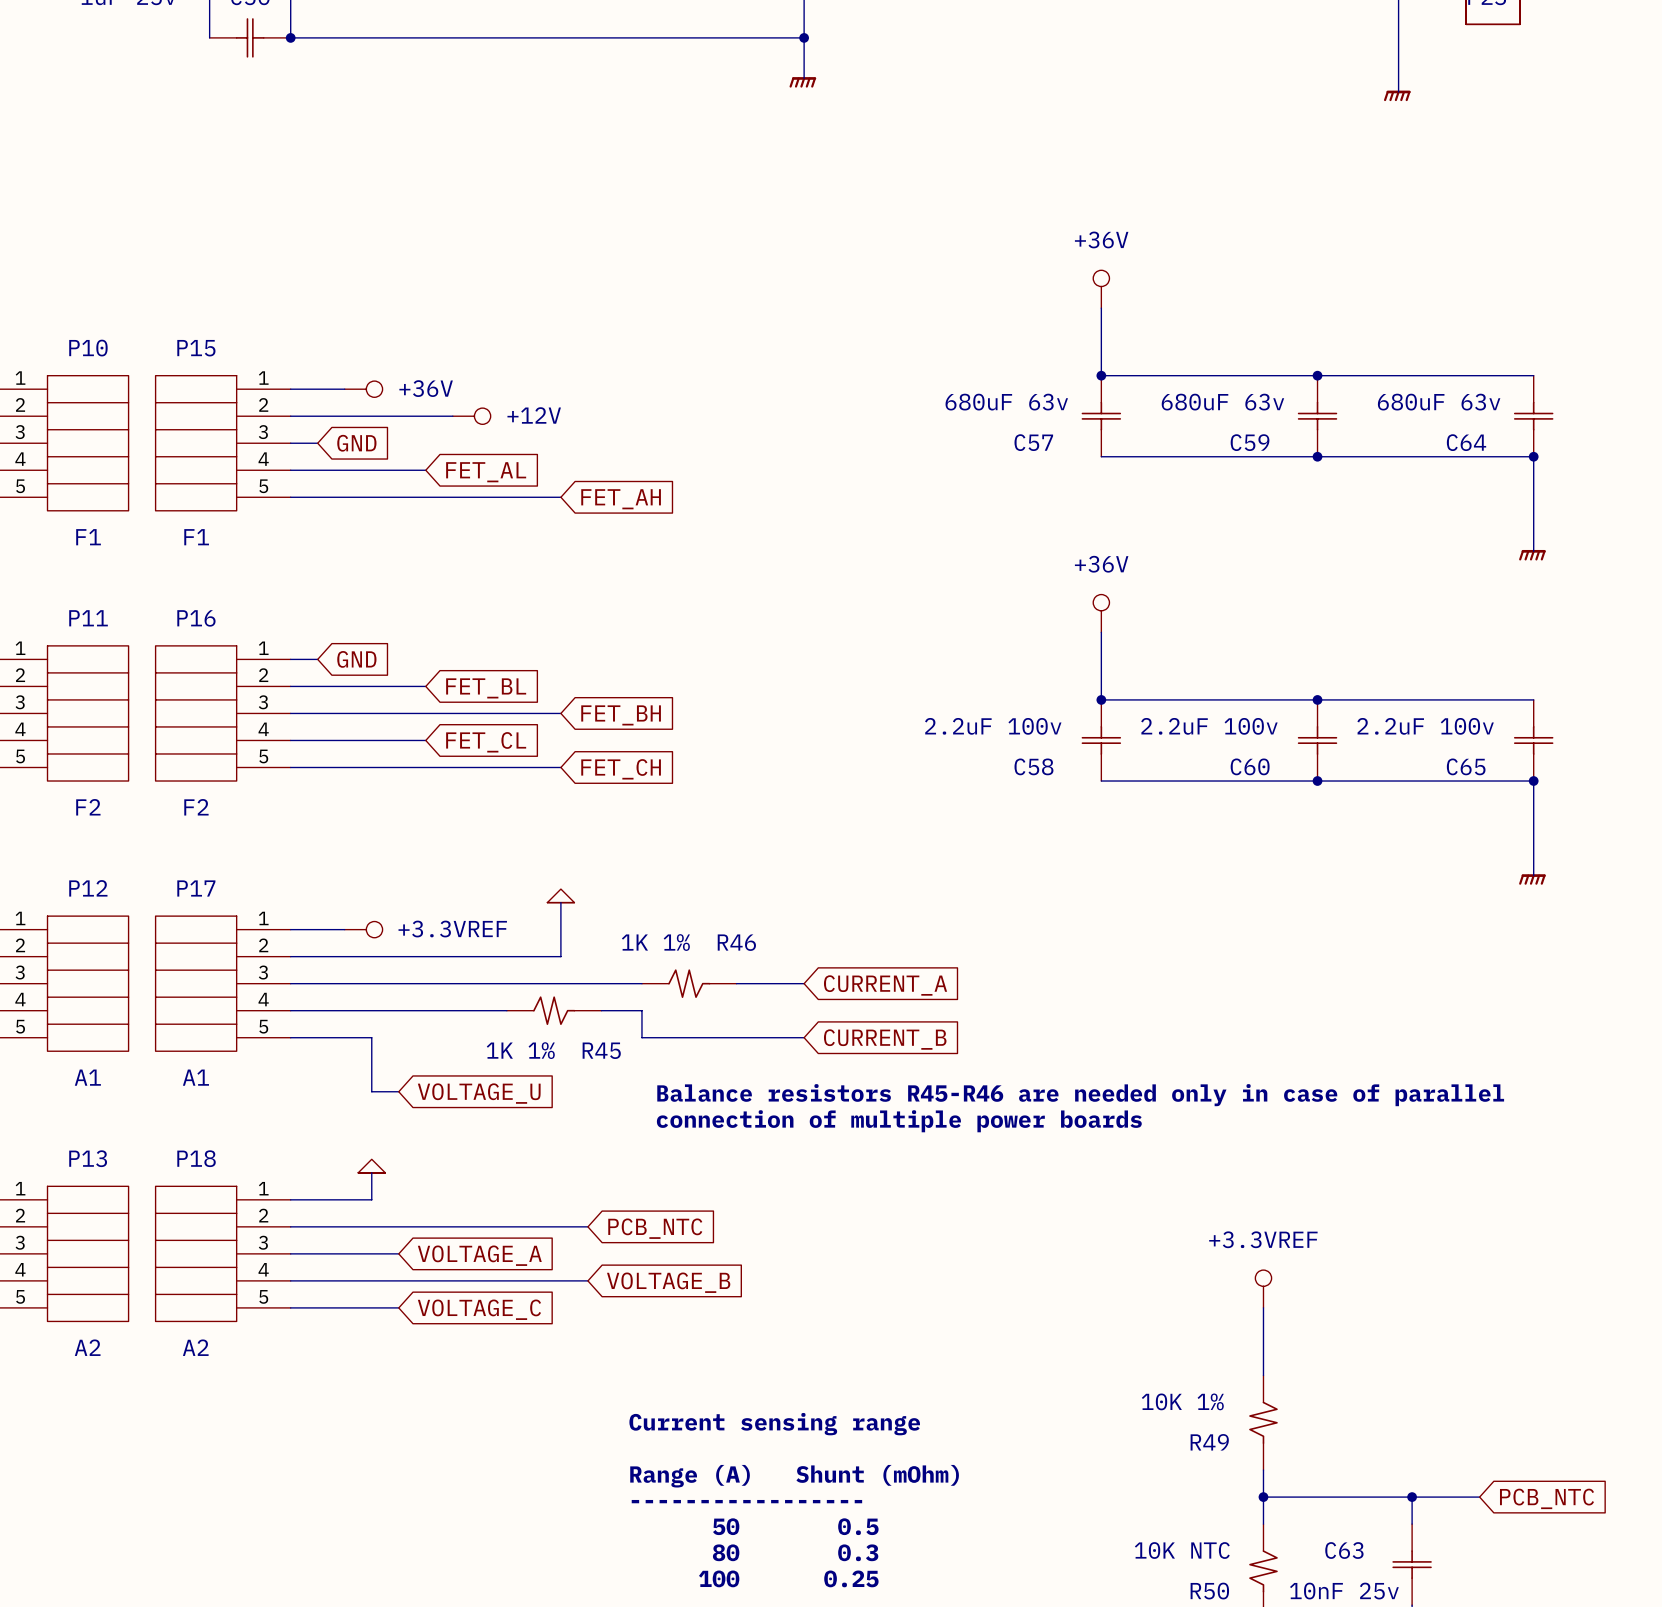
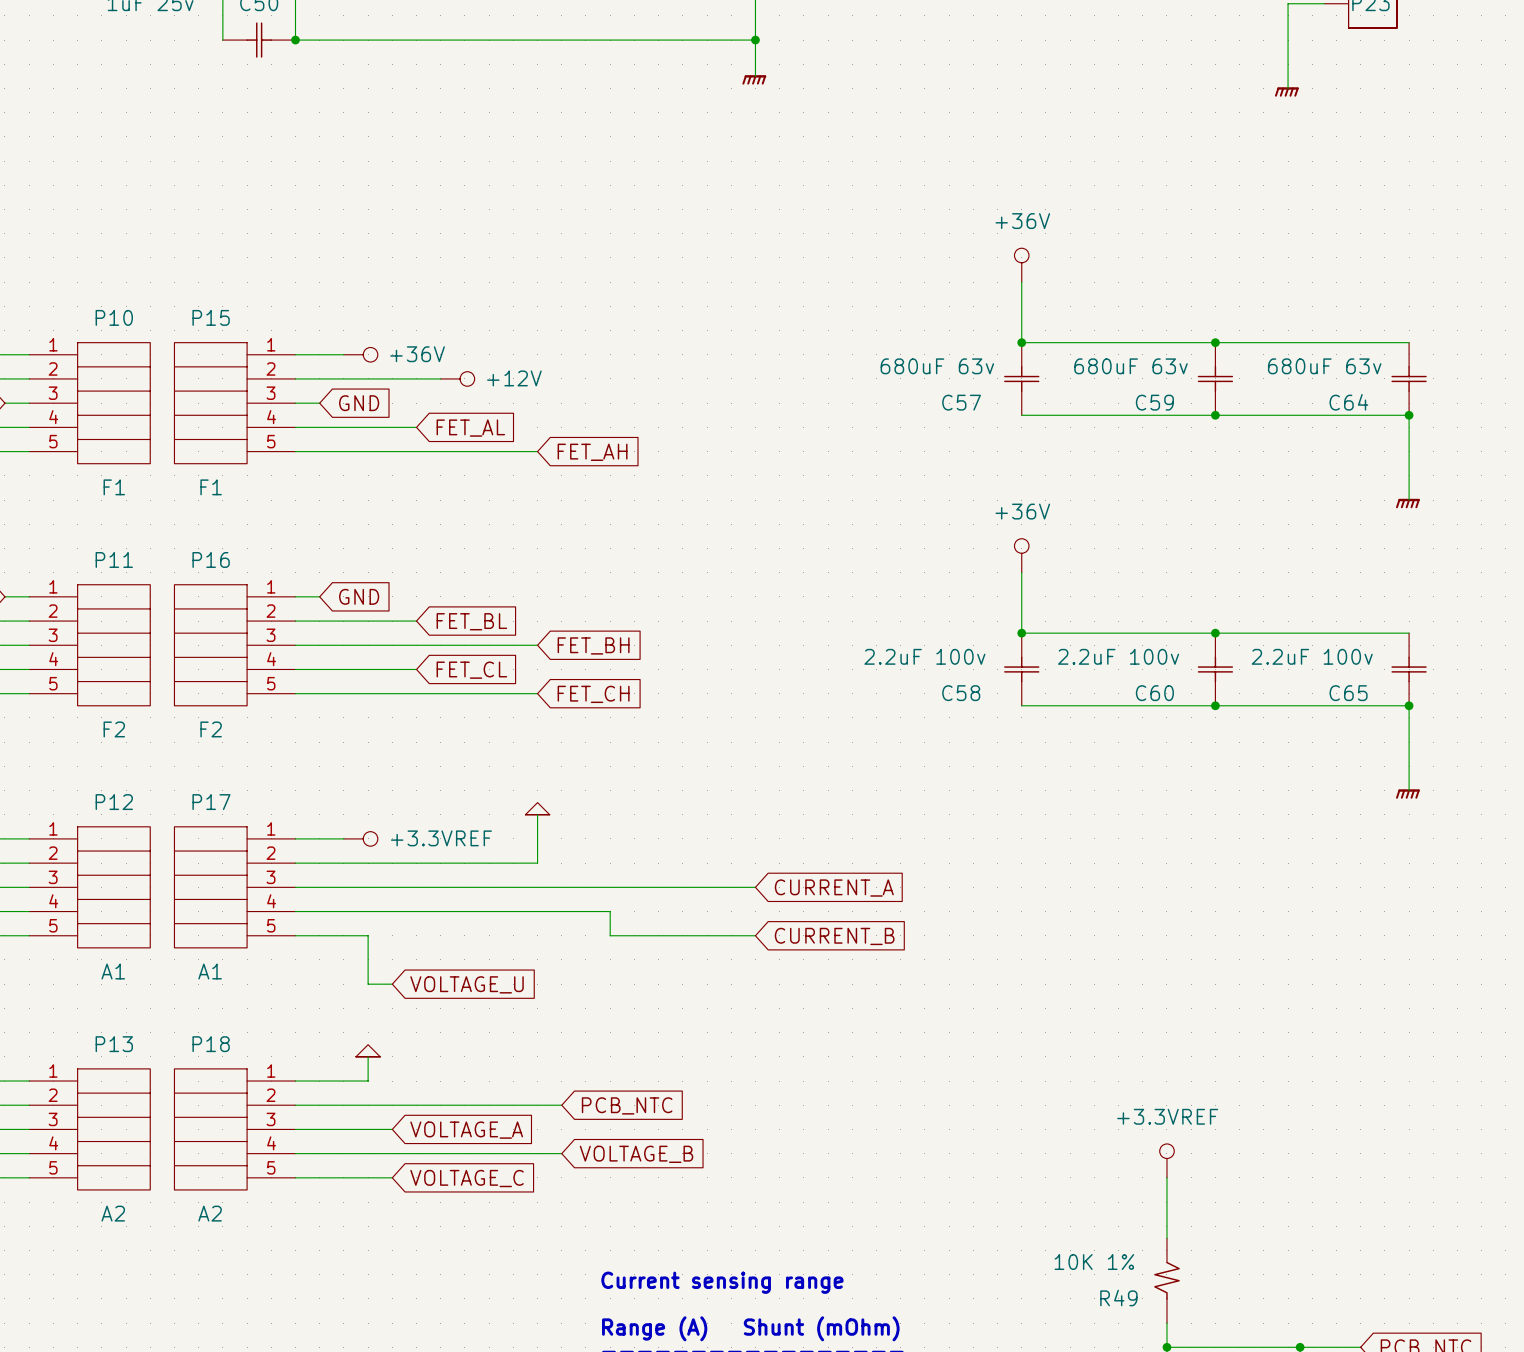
R46: 1K 1% (689, 983) -> none
R45: 1K 1% (554, 1010) -> none
text: Balance resistors R45-R46 are needed only in case of parallel (1080, 1095) -> none
text: connection of multiple power boards (899, 1121) -> none

